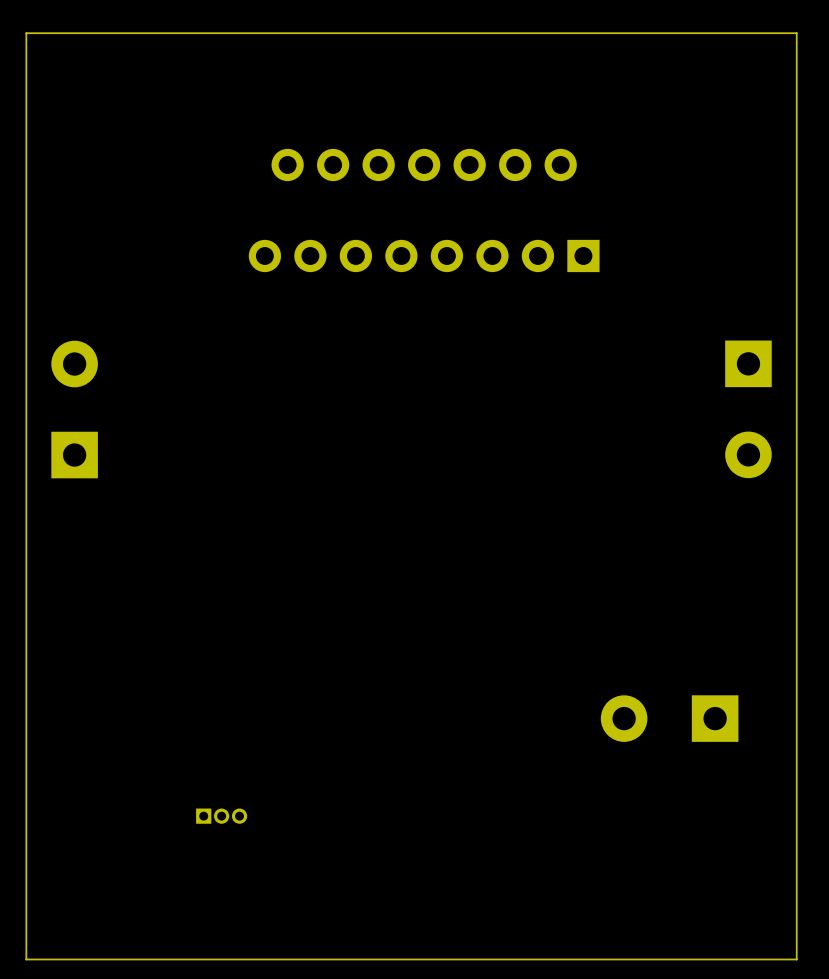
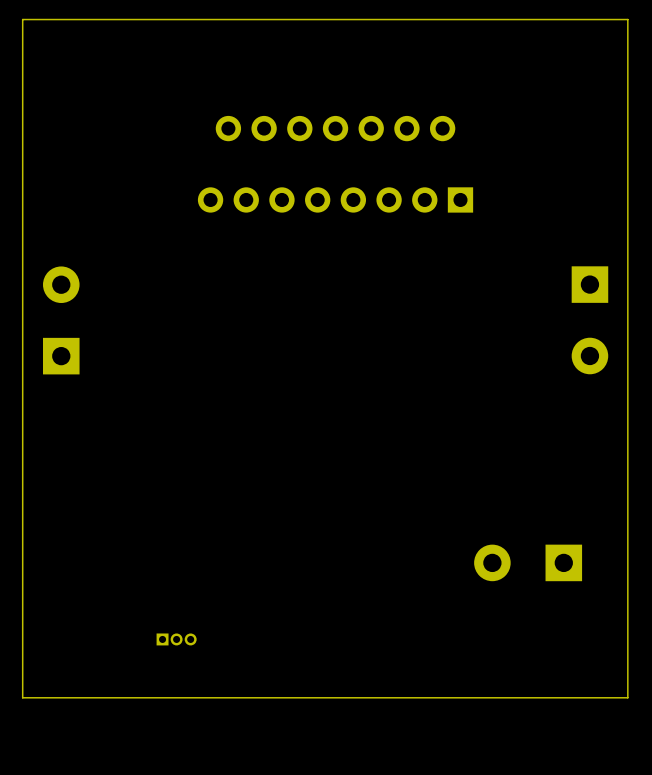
board edge: (796, 33) (26, 33) (26, 959) (796, 959) (796, 890) -> (627, 25) (627, 19) (22, 19) (22, 697) (627, 697)

